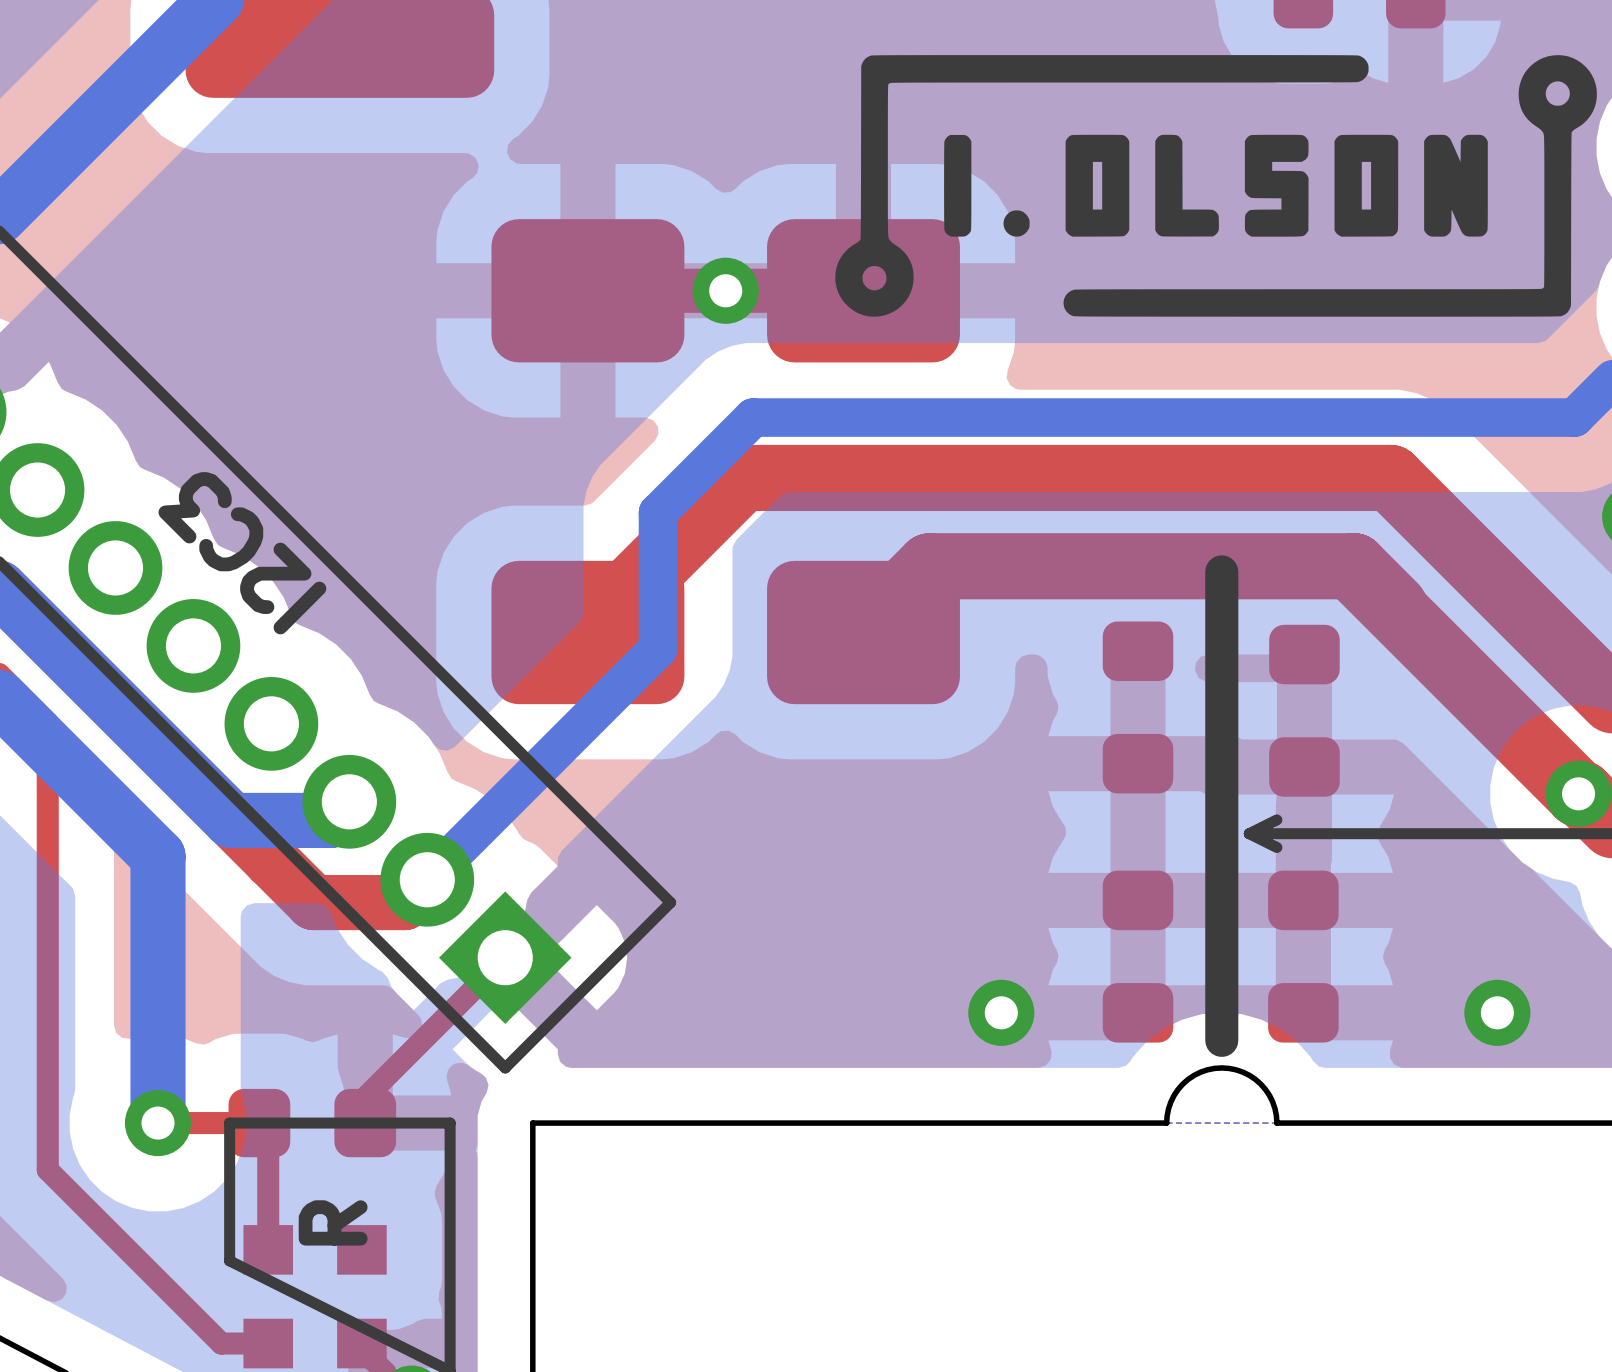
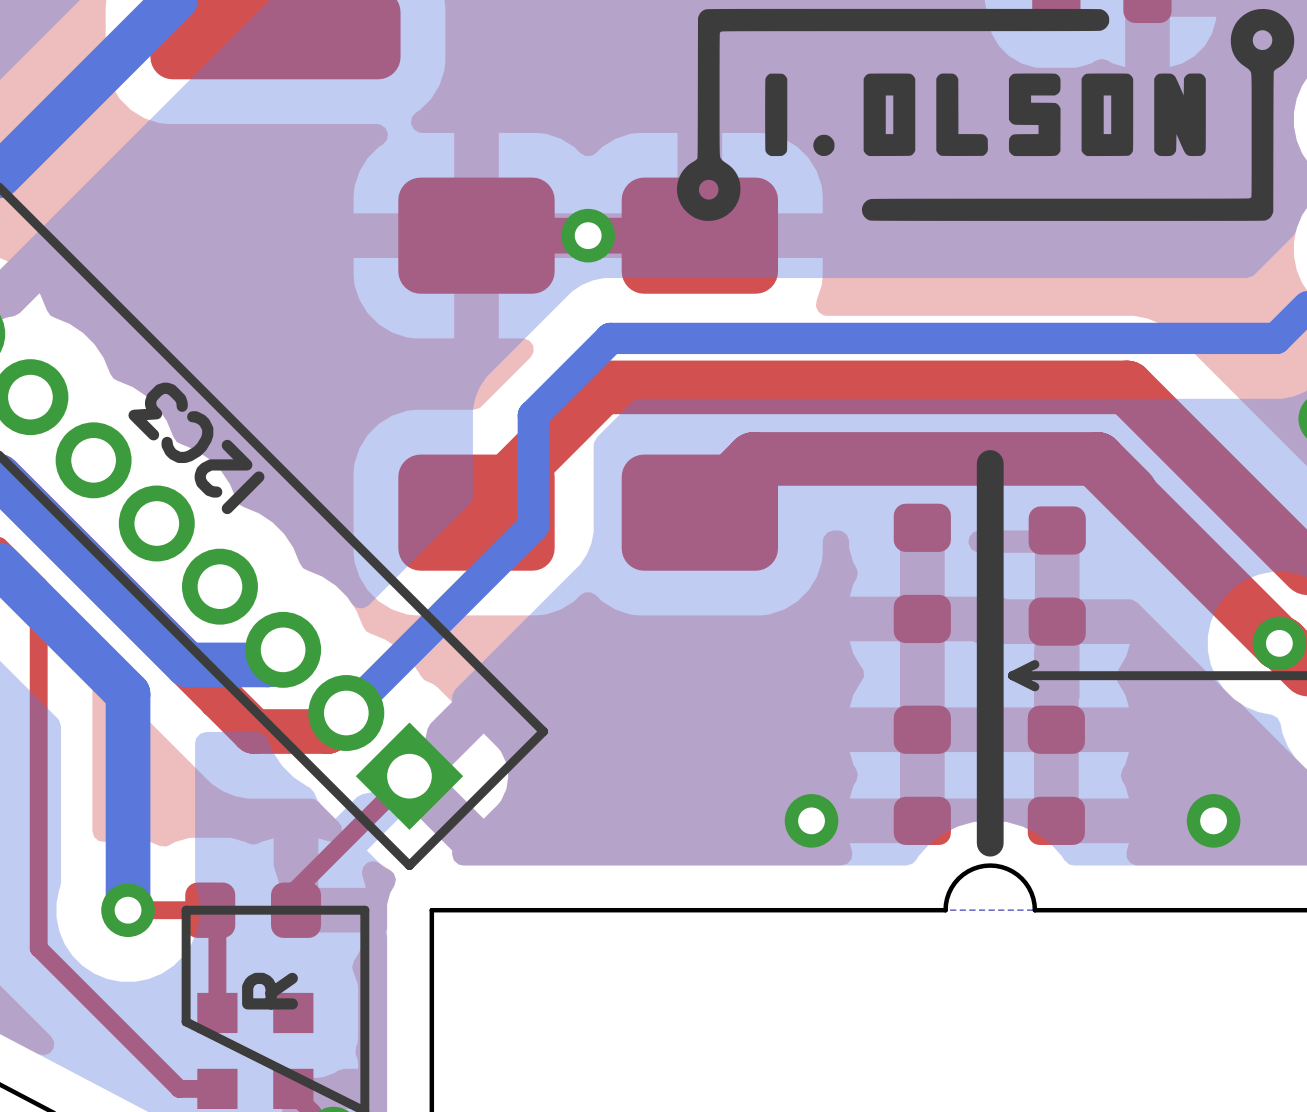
drawing position: (1216, 185) -> (985, 114)

